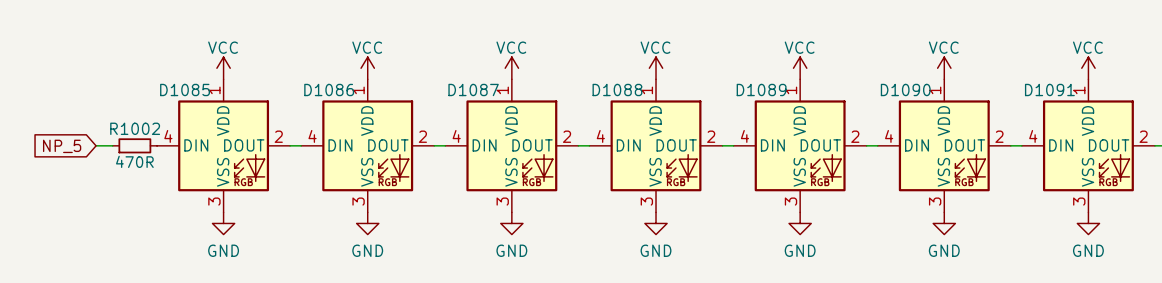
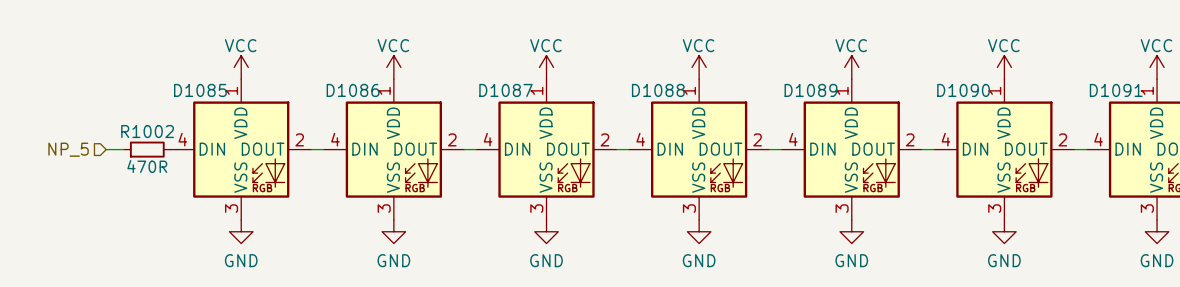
hierarchical label: none -> NP_5 (68, 149)
global label: NP_5 (62, 146) -> none

